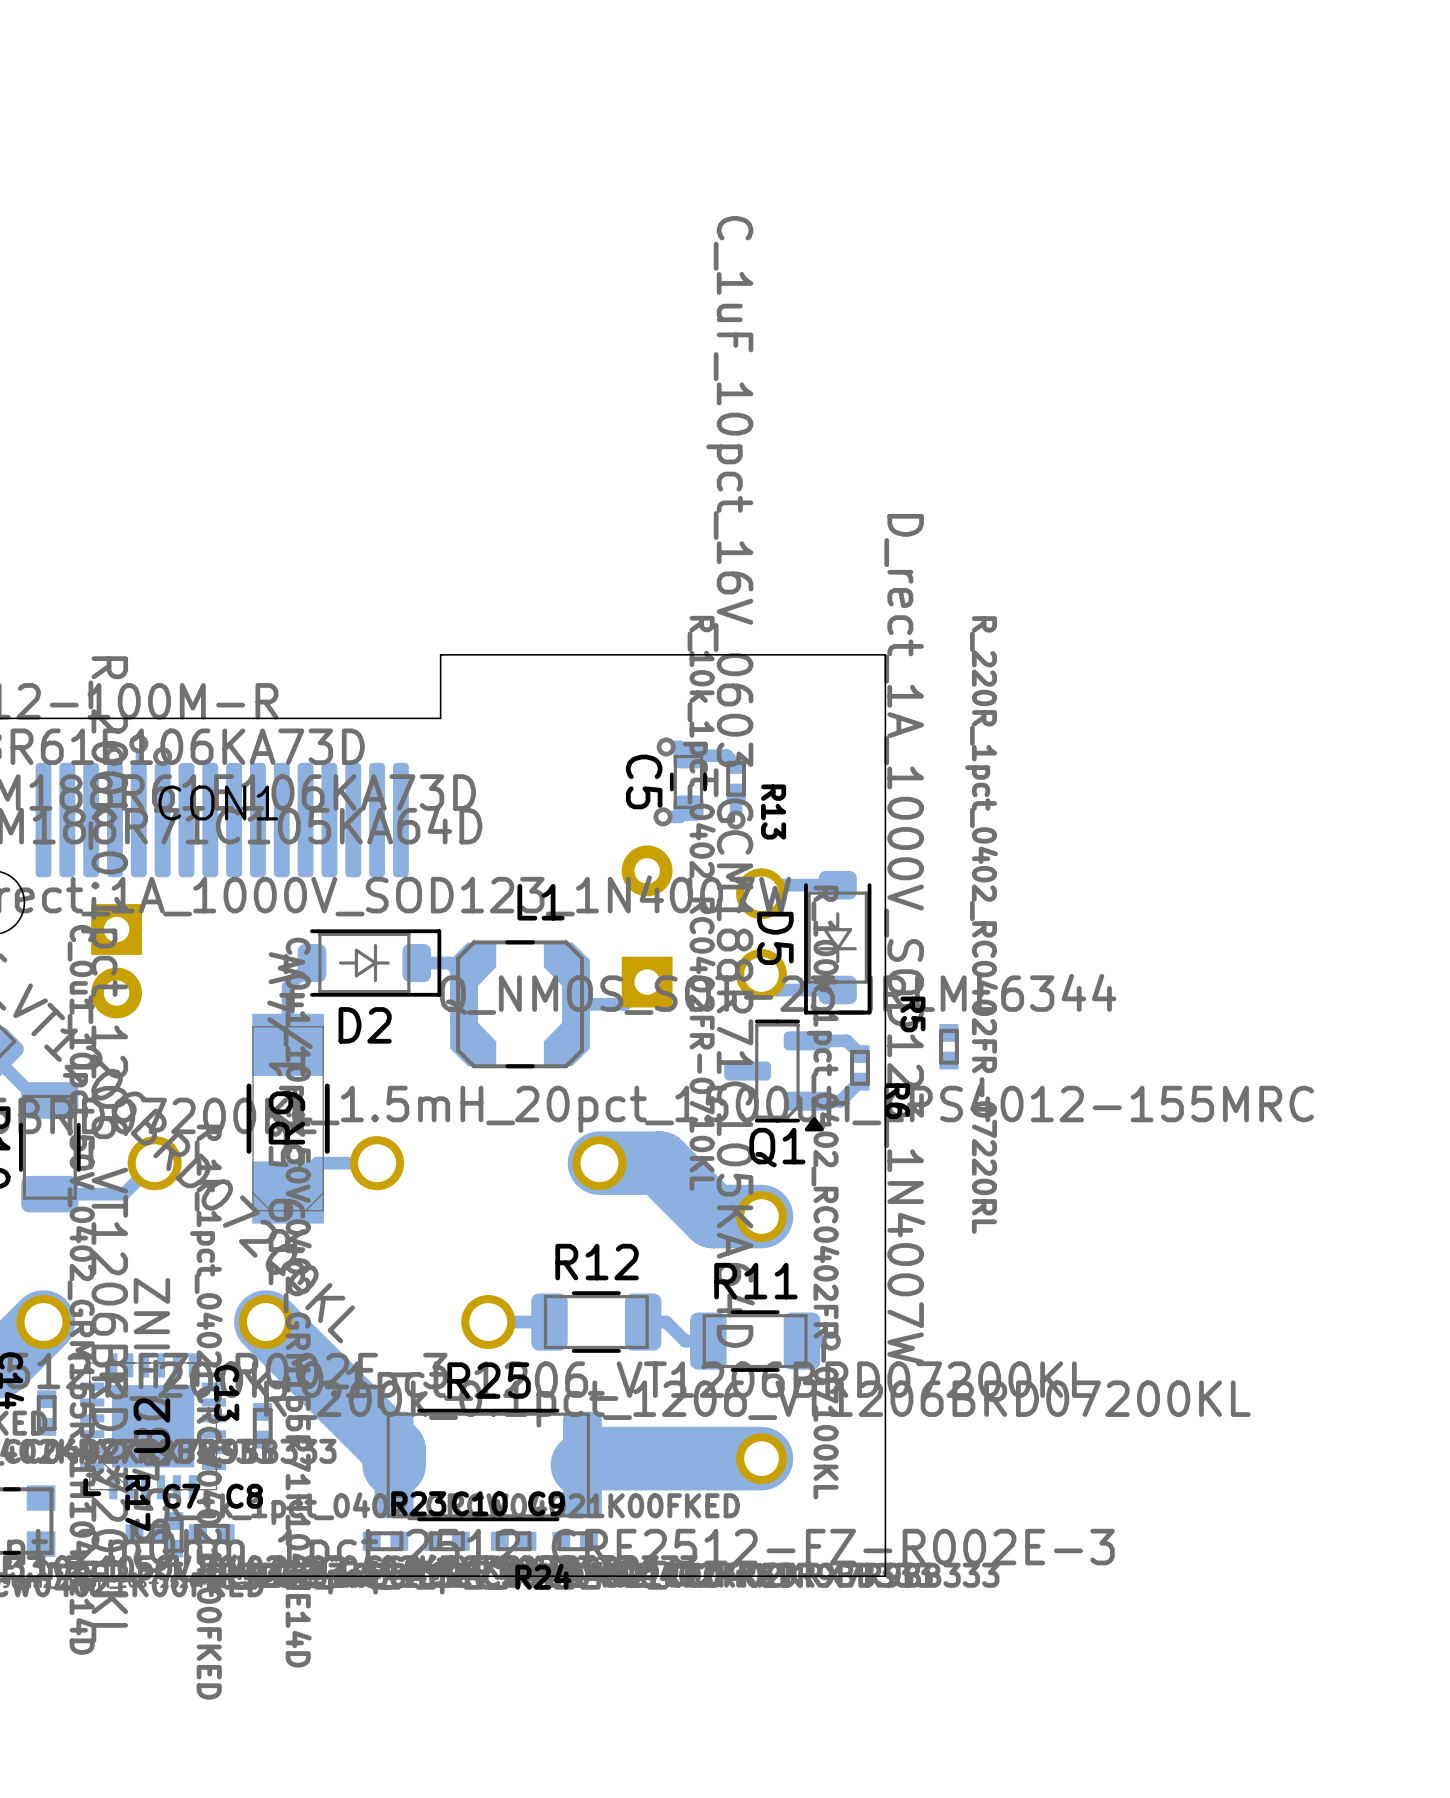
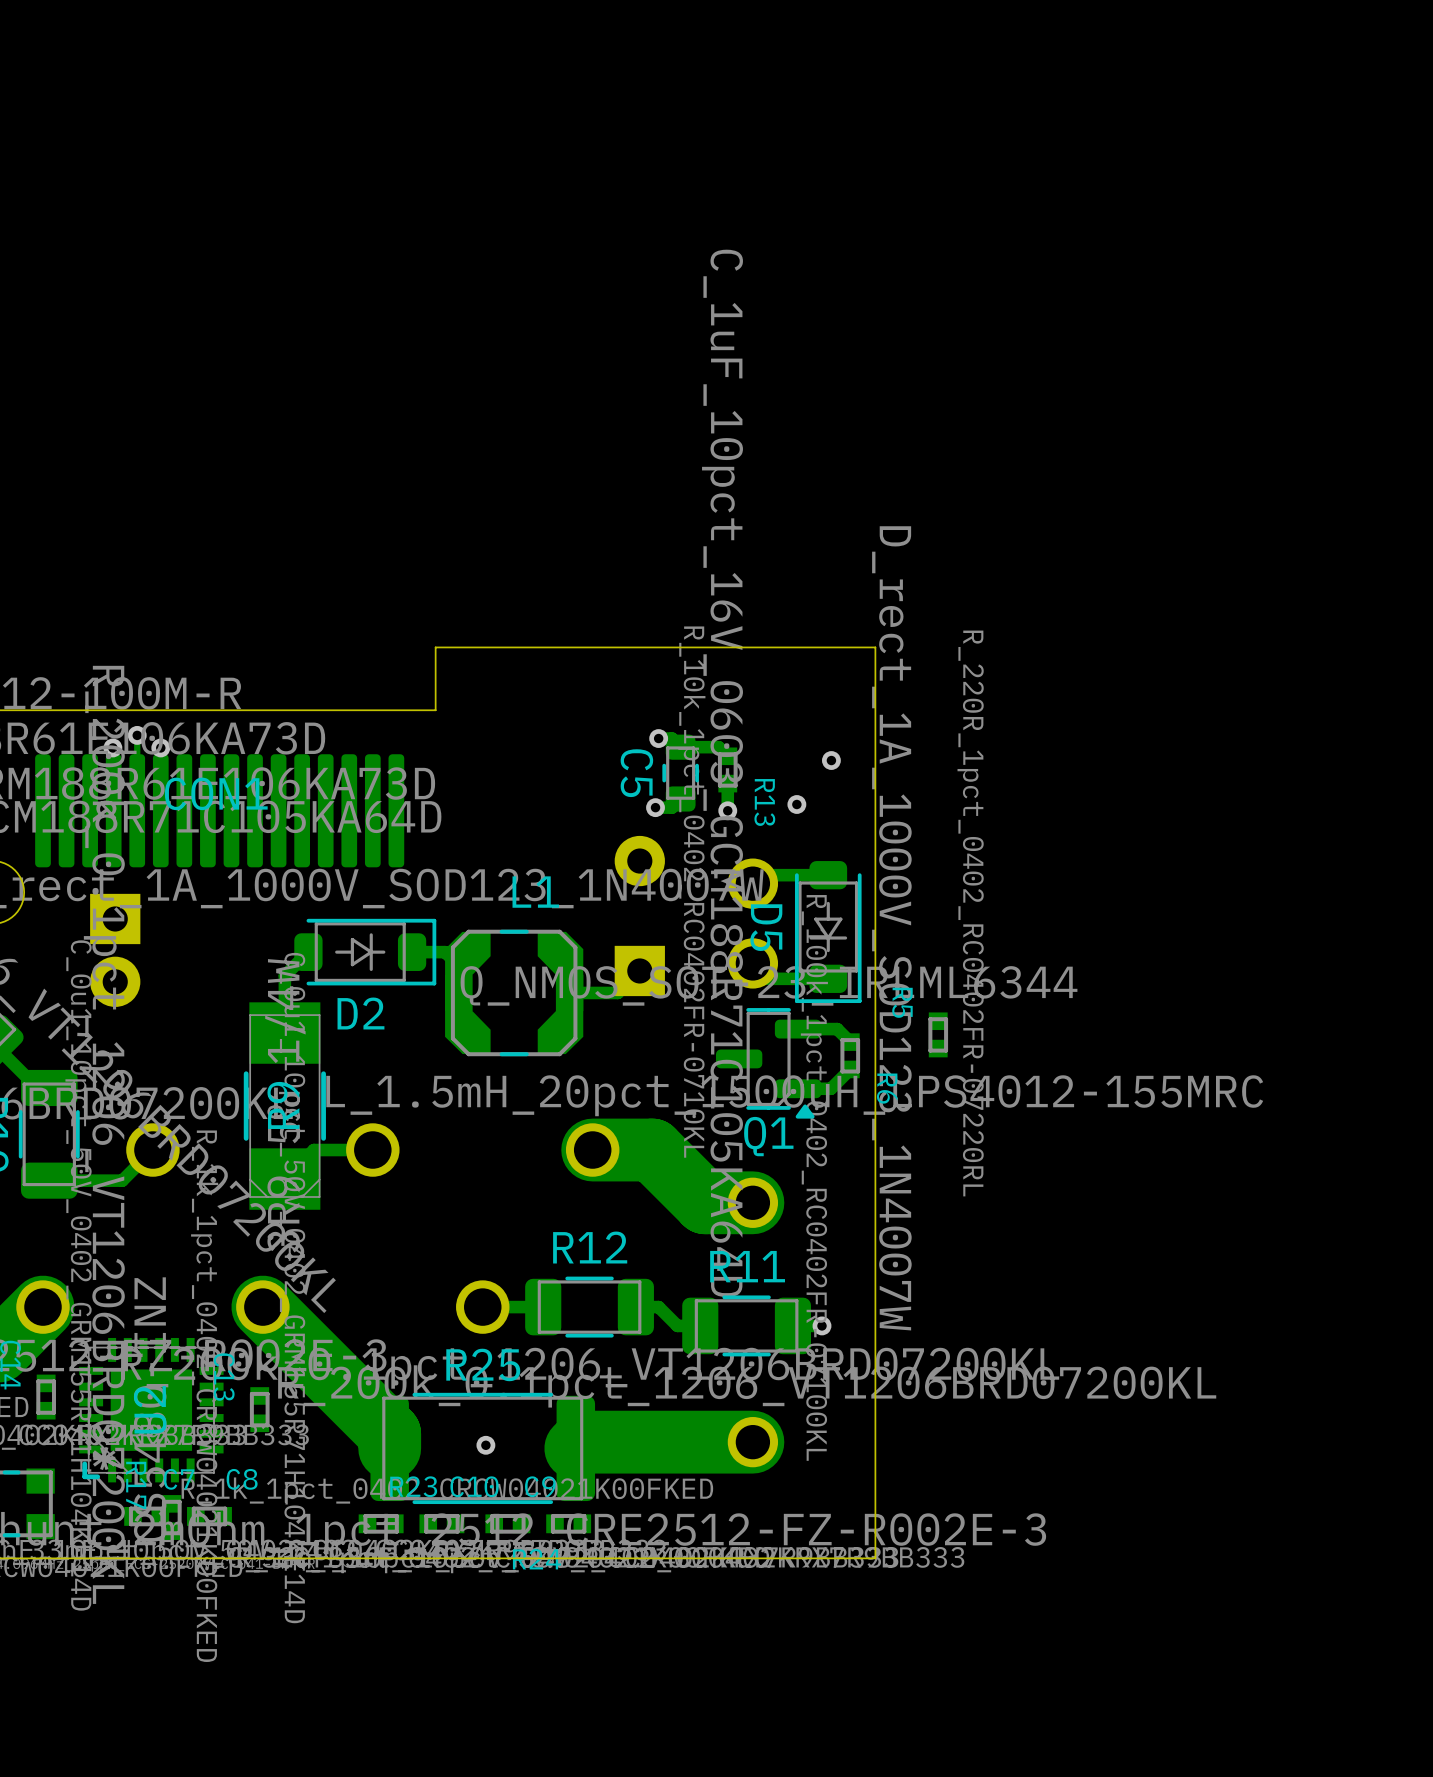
via: none -> (831, 760)
via: none -> (796, 804)
via: none -> (485, 1445)

